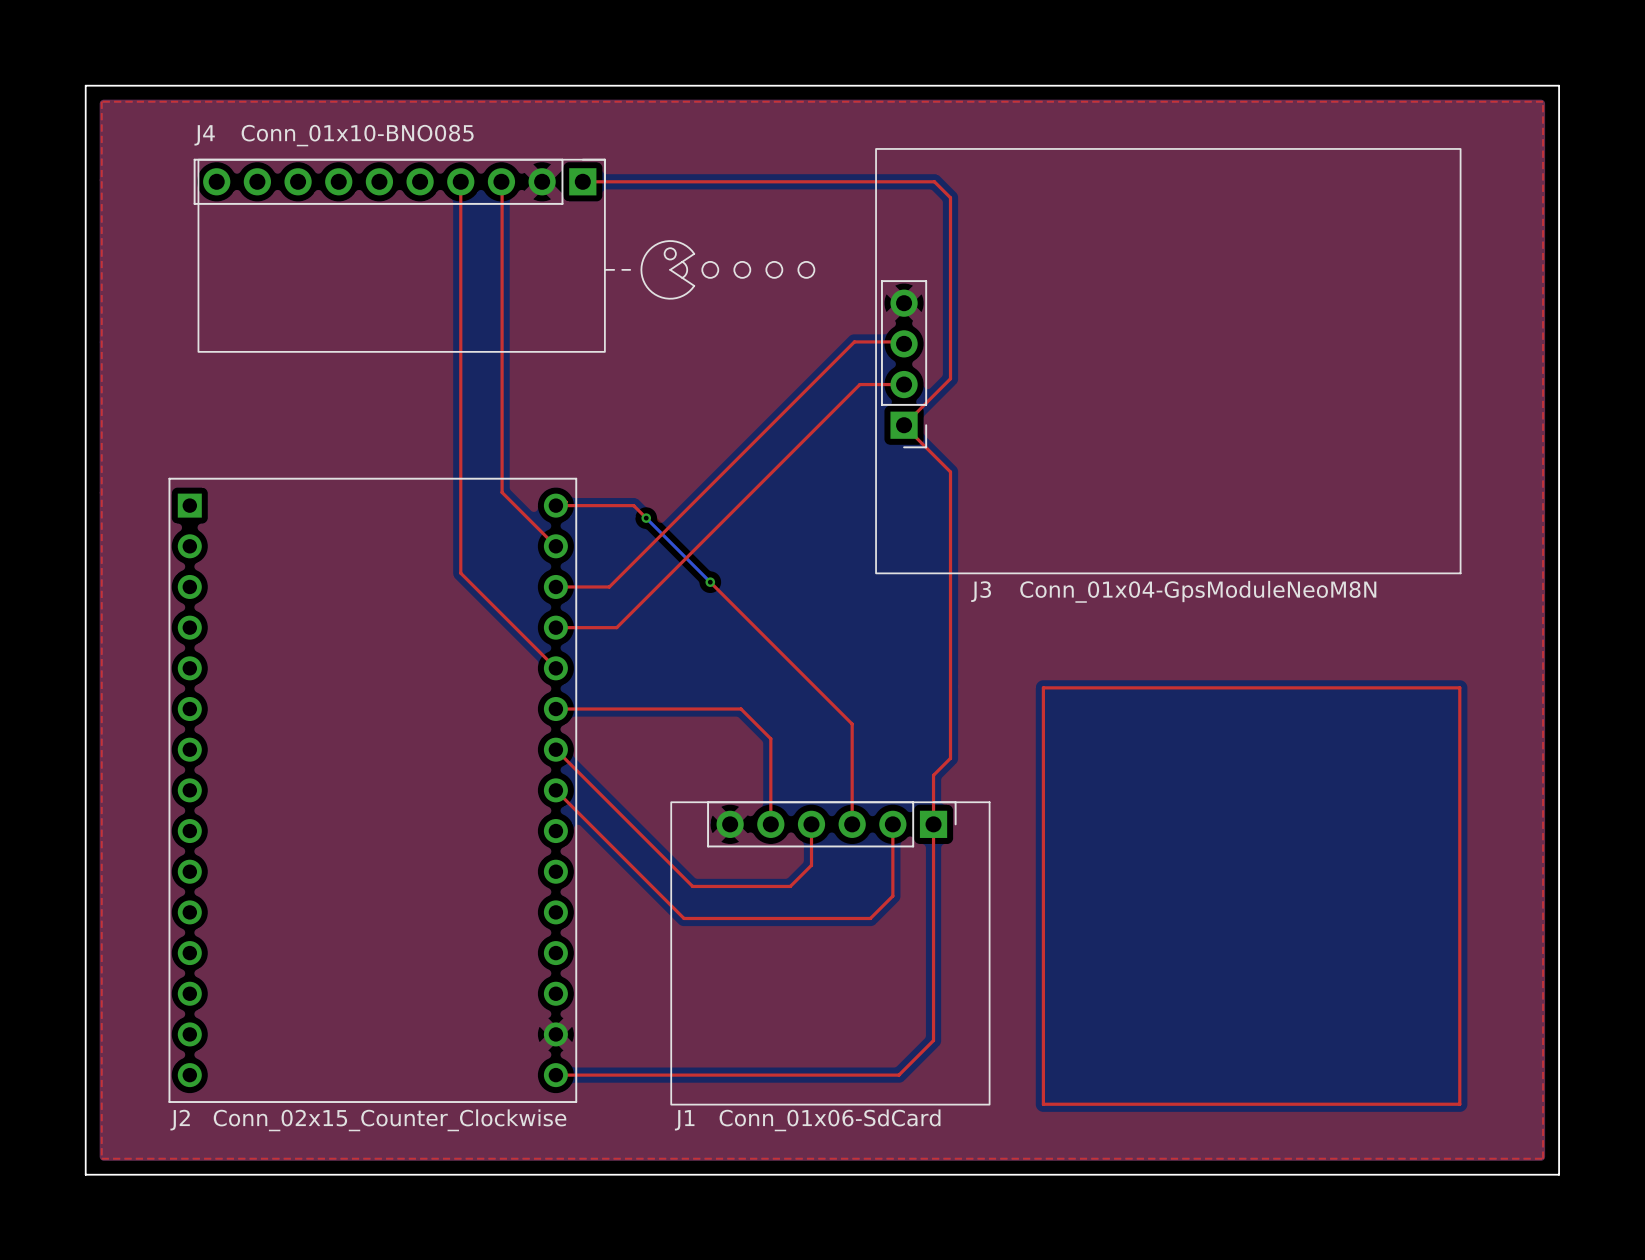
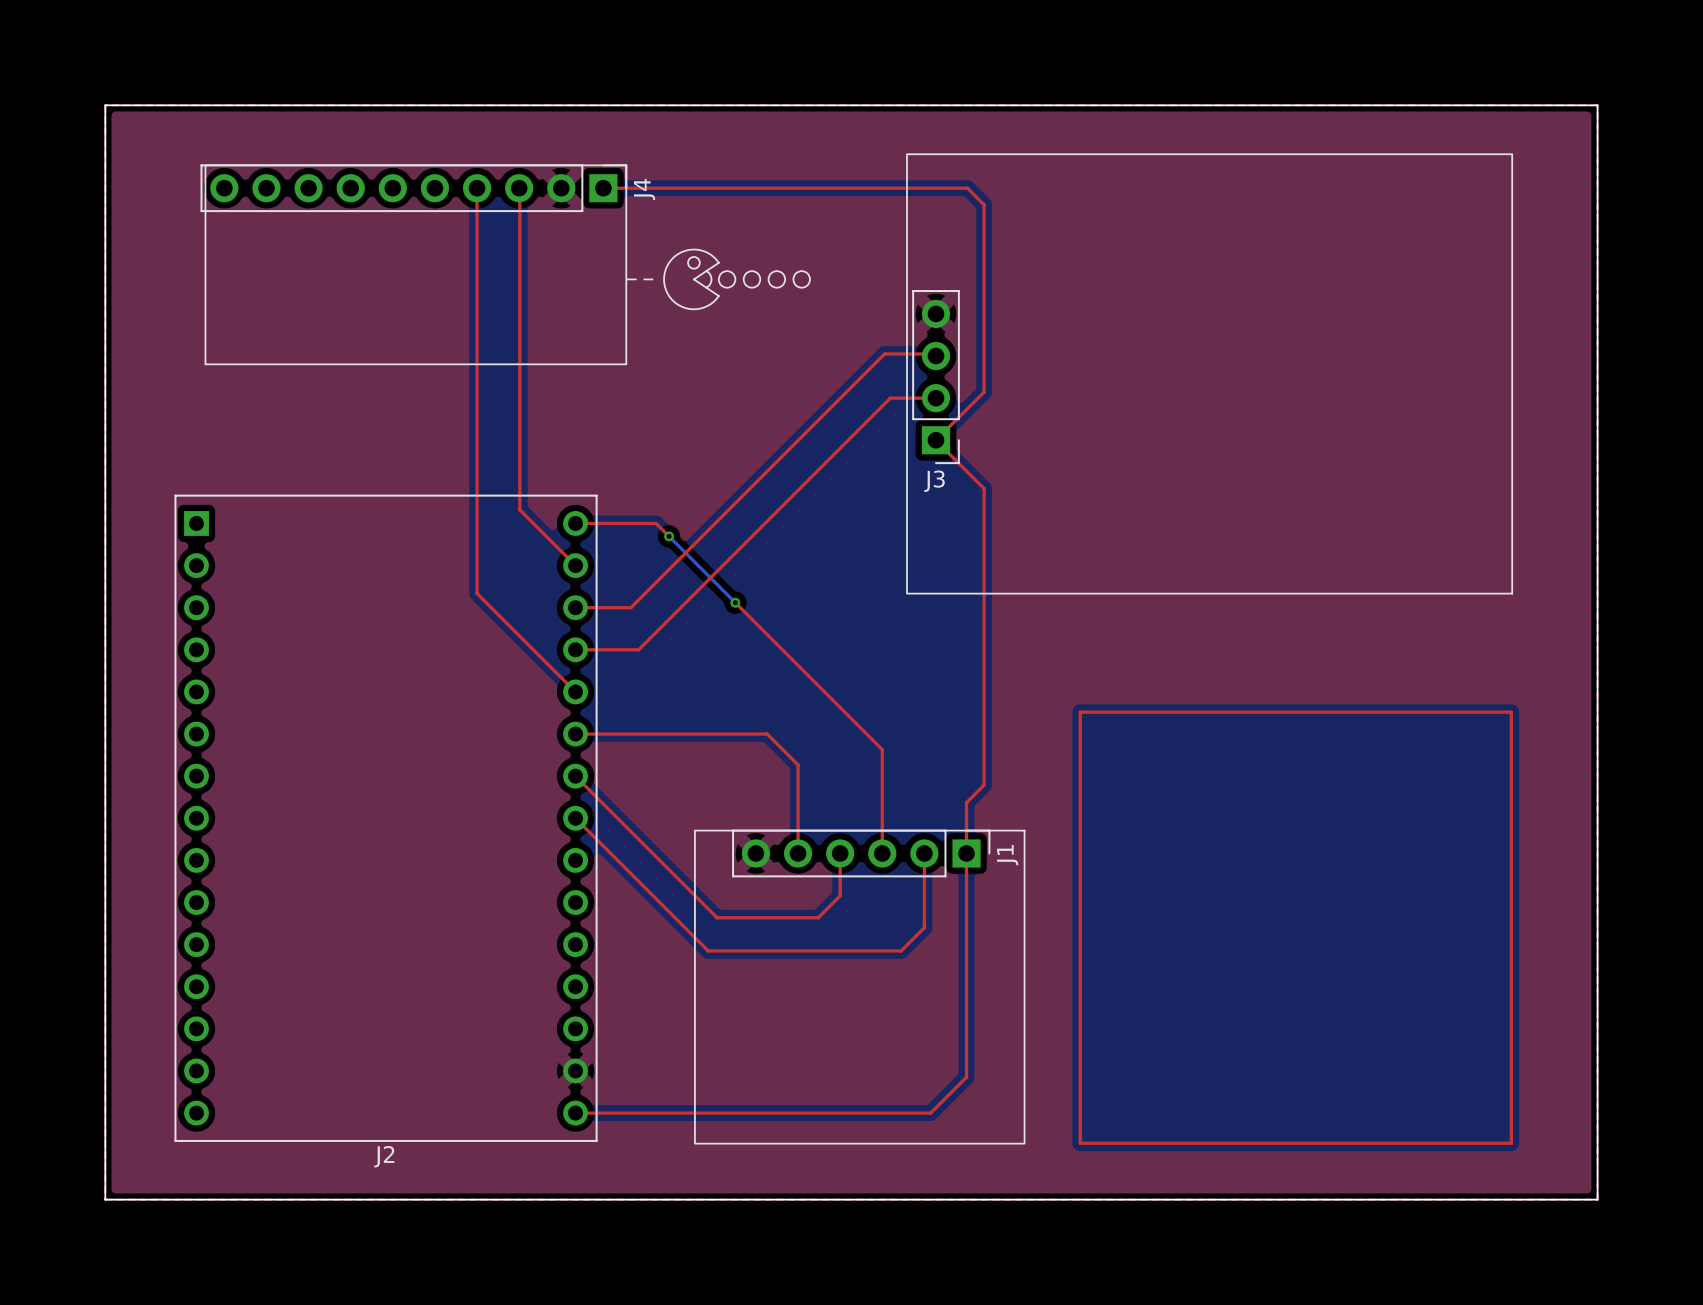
board edge: (85, 85) (1559, 85) (1559, 1174) (85, 1174) (85, 85) -> (105, 105) (105, 1199) (1597, 1199) (1597, 105) (105, 105)
J4 name rotation: 0° (204, 135) -> 90° counterclockwise (644, 189)
J4 name position: J4 (204, 135) -> J4 (644, 189)
J4 value: Conn_01x10-BNO085 (357, 135) -> none
drawing: none -> [717, 270, 786, 289]
drawing: [701, 261, 752, 279] -> none
drawing: [797, 261, 816, 279] -> none
J3 name position: J3 (981, 591) -> J3 (934, 481)
J3 value: Conn_01x04-GpsModuleNeoM8N (1198, 591) -> none
J2 name position: J2 (180, 1120) -> J2 (384, 1156)
J2 value: Conn_02x15_Counter_Clockwise (390, 1120) -> none
J1 name rotation: 0° (684, 1120) -> 90° counterclockwise (1007, 855)
J1 name position: J1 (684, 1120) -> J1 (1007, 855)
J1 value: Conn_01x06-SdCard (830, 1120) -> none

